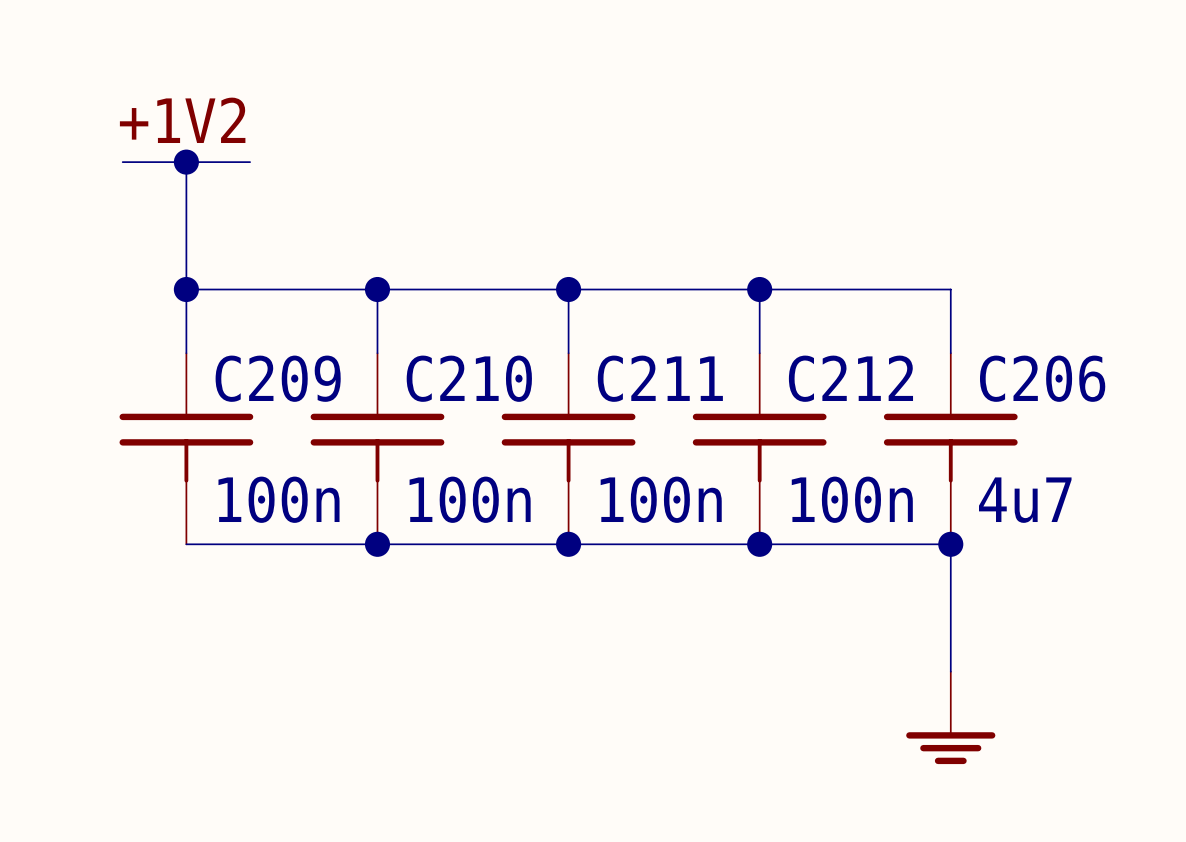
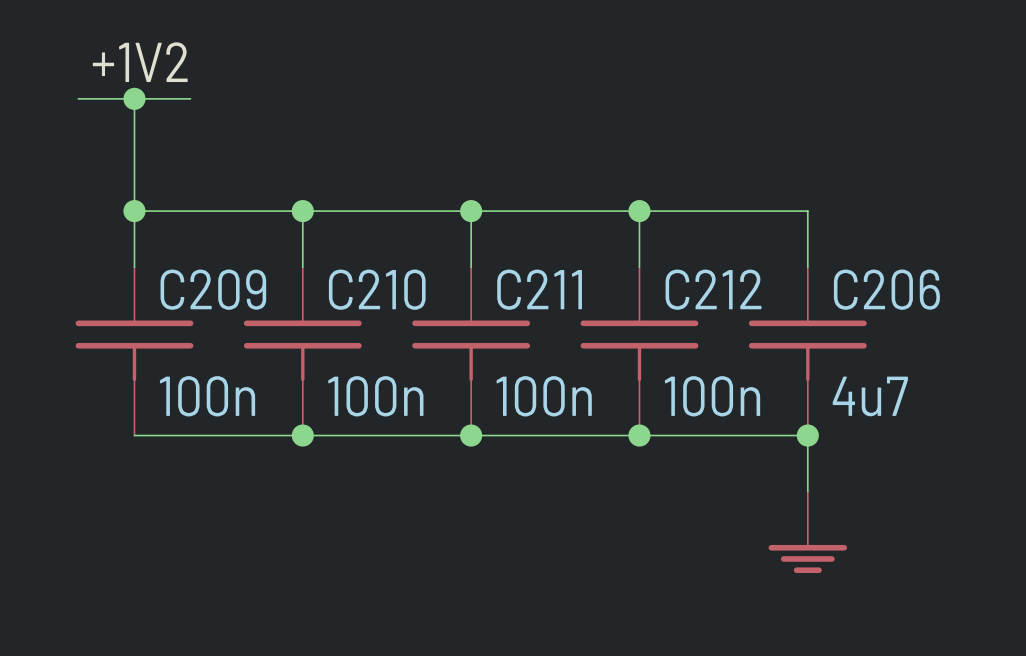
power symbol position: (950, 717) -> (807, 532)

